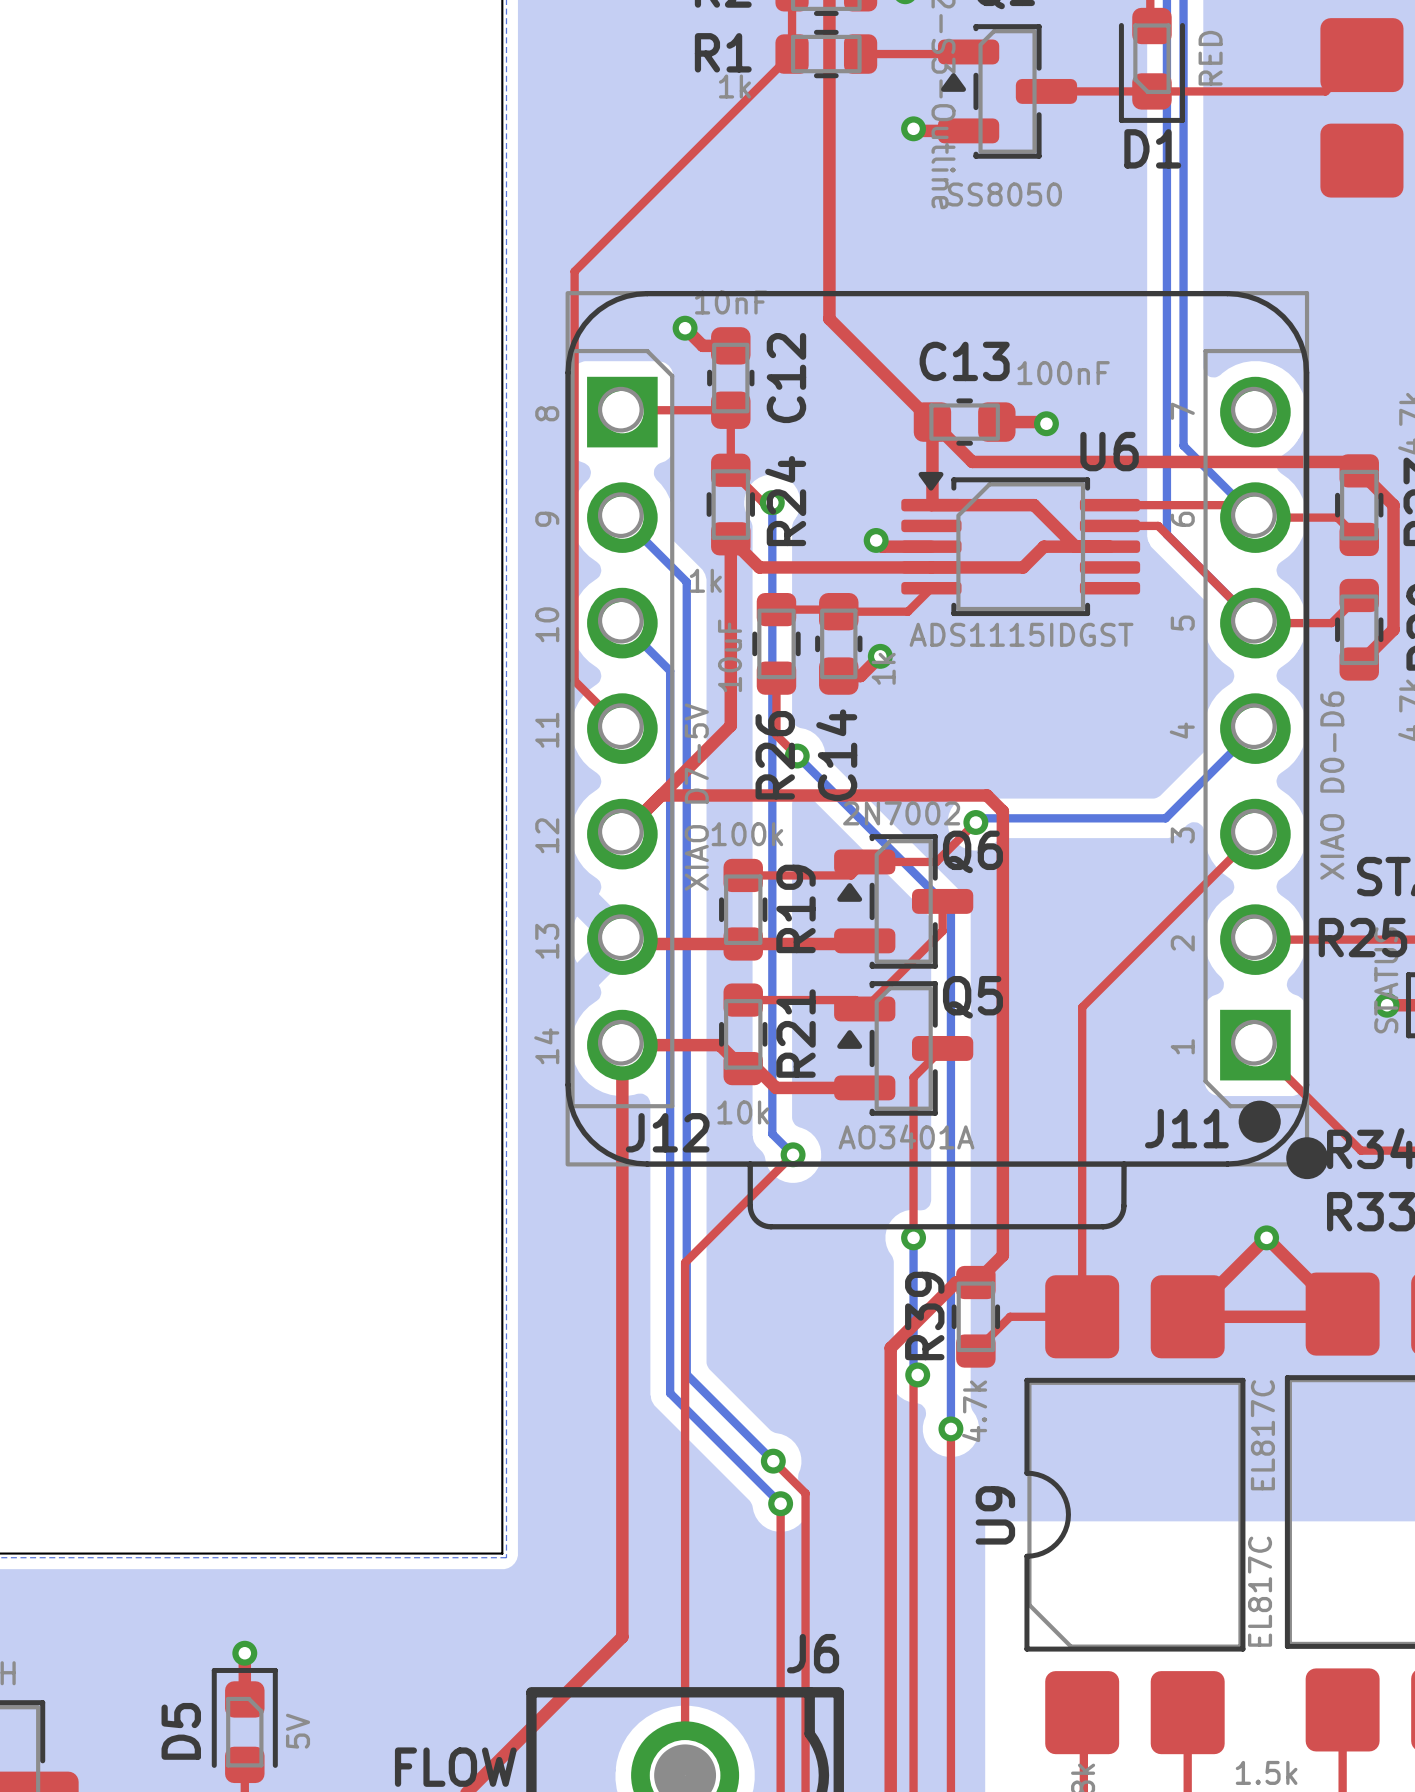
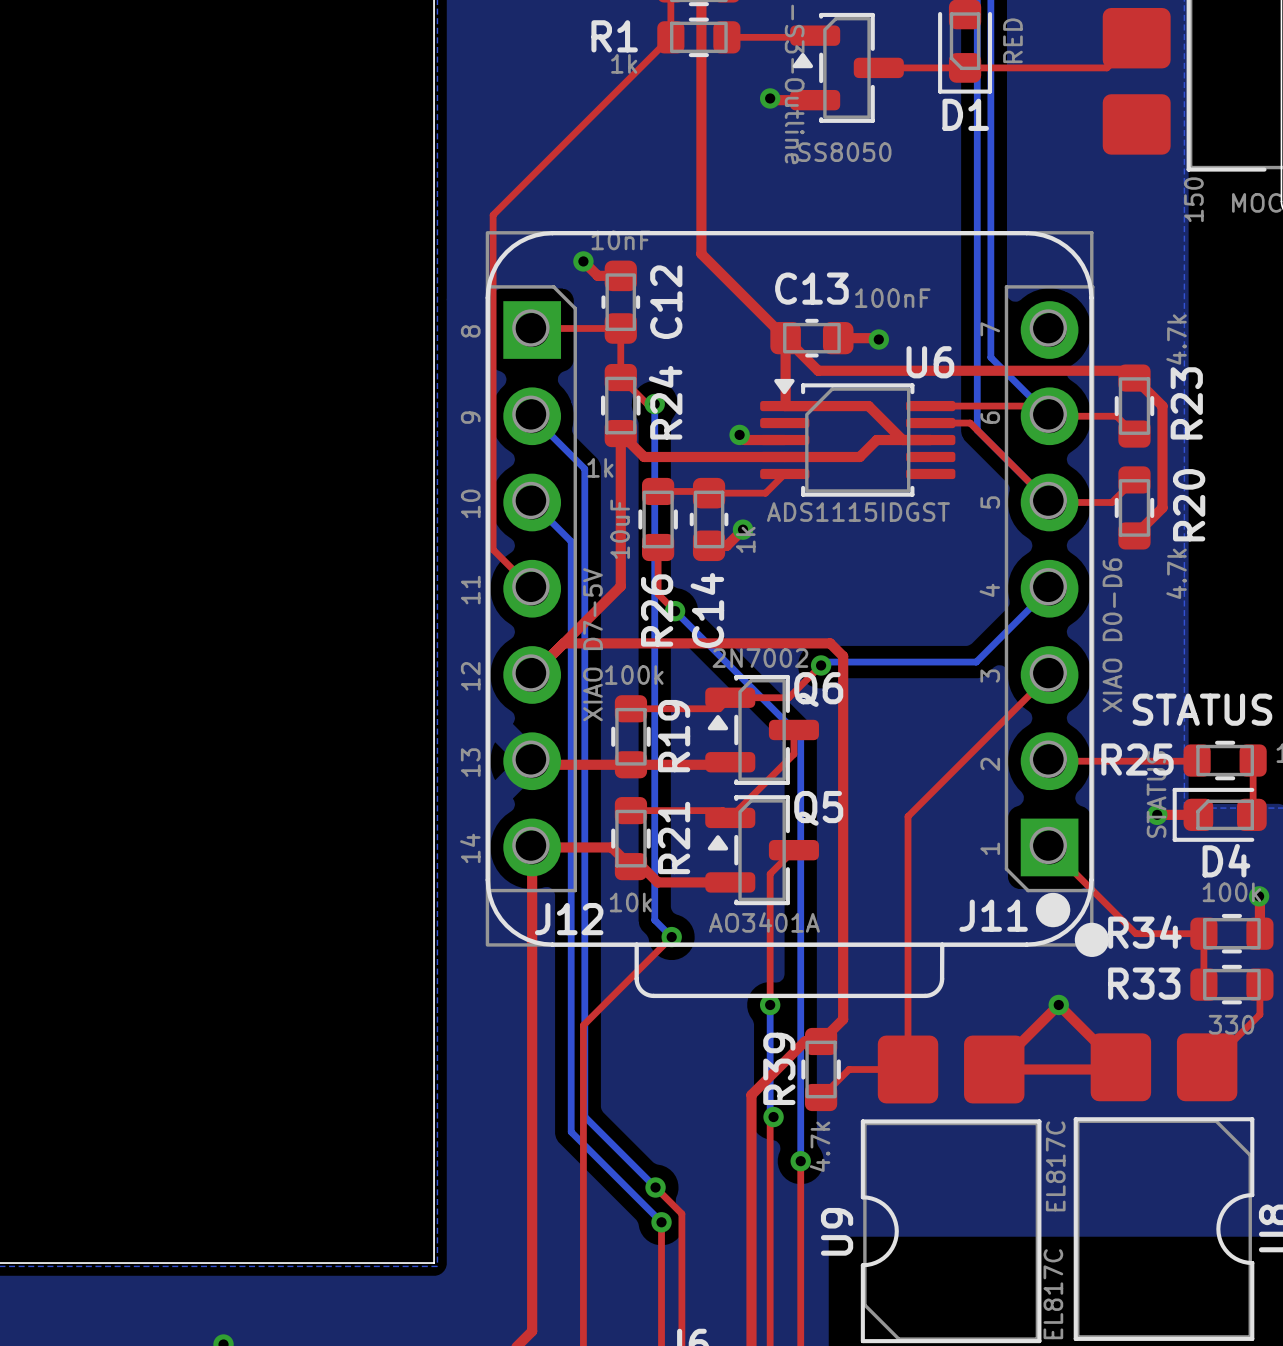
J12 footprint: [570, 348, 675, 1109] -> [487, 285, 577, 893]
J11 footprint: [1203, 348, 1308, 1109] -> [1004, 285, 1095, 893]

